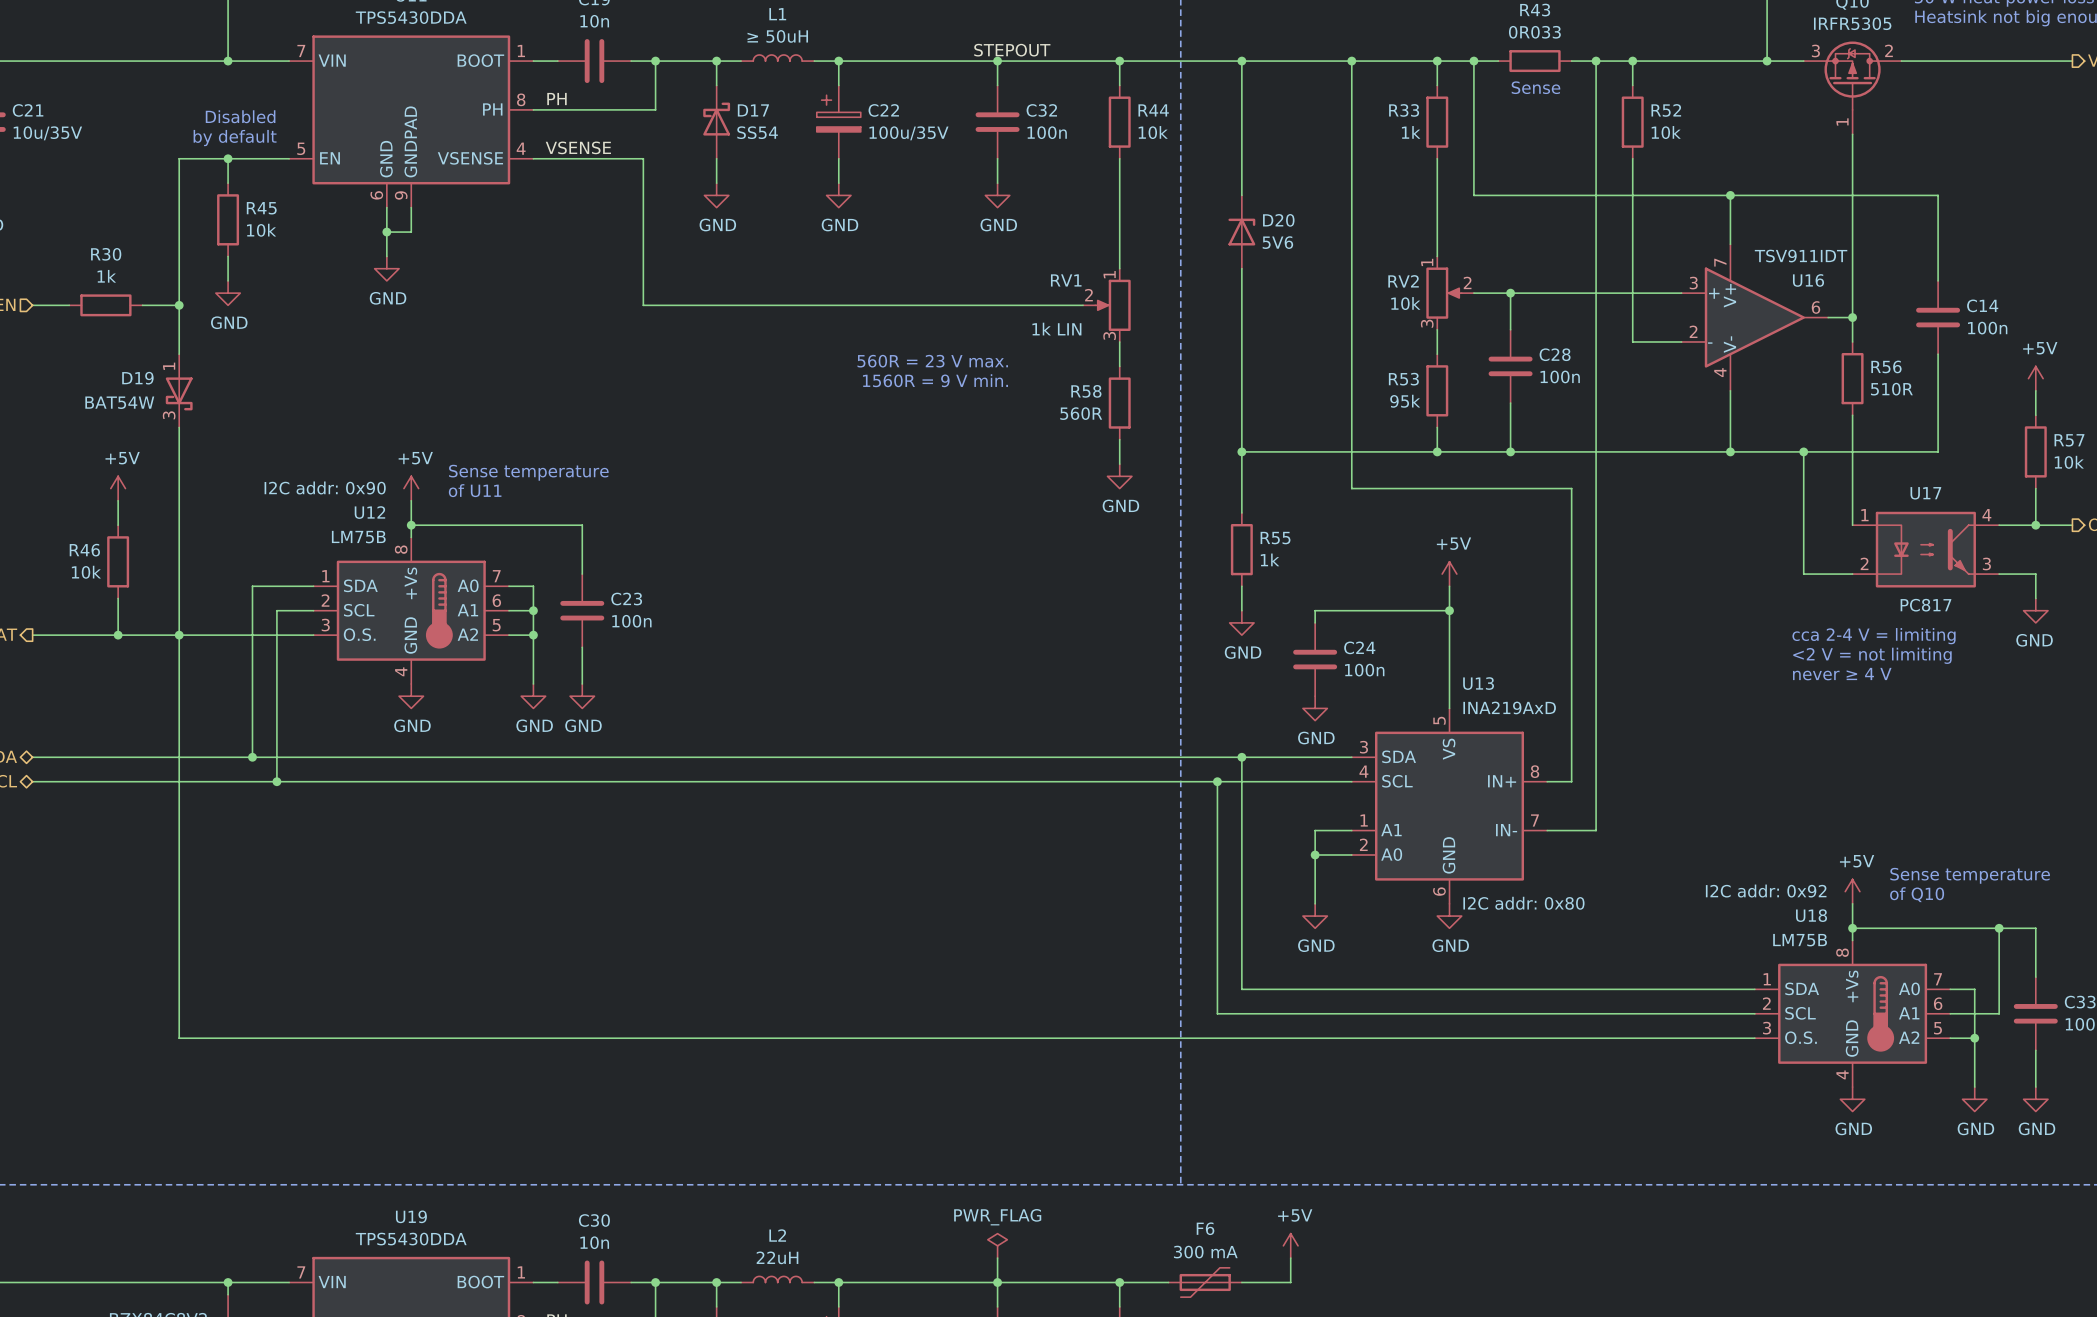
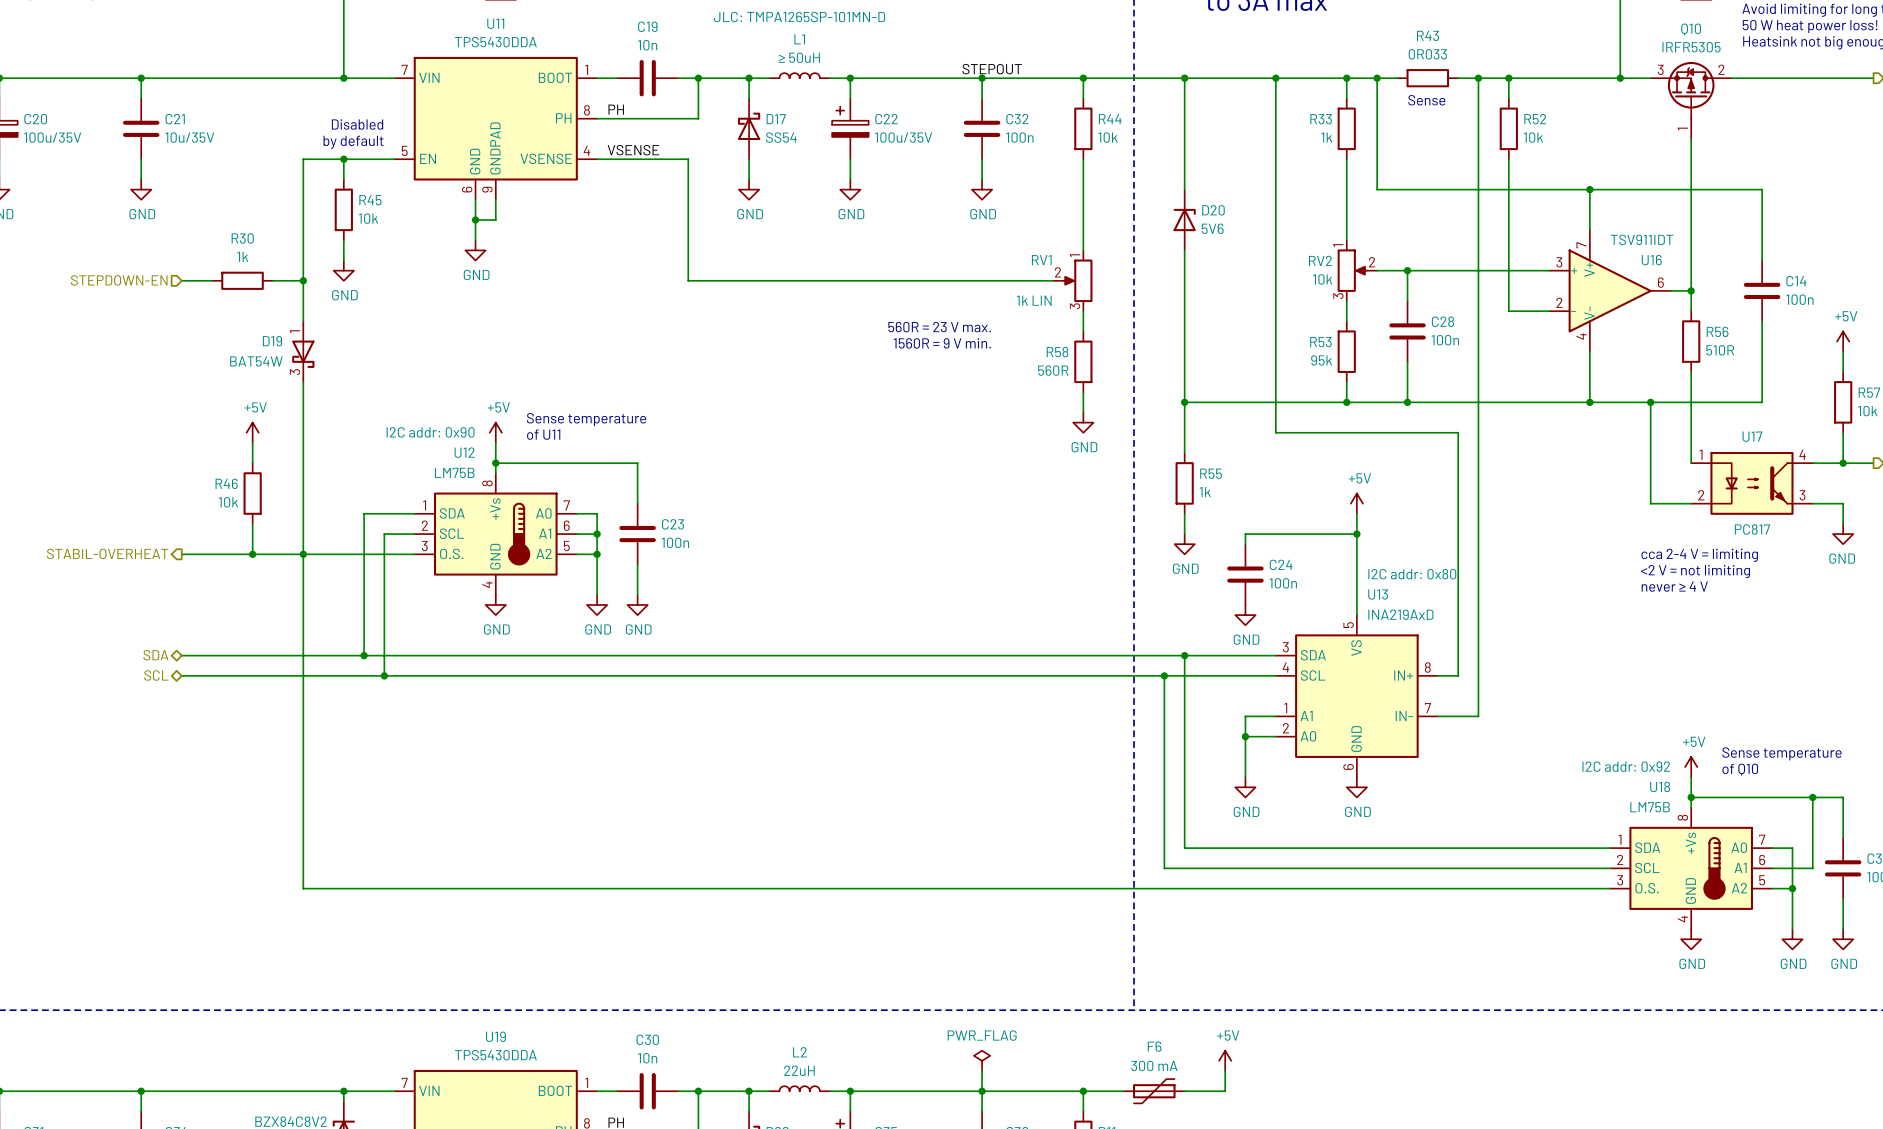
U13 text position: I2C addr: 0x80 (1523, 903) -> I2C addr: 0x80 (1412, 574)

